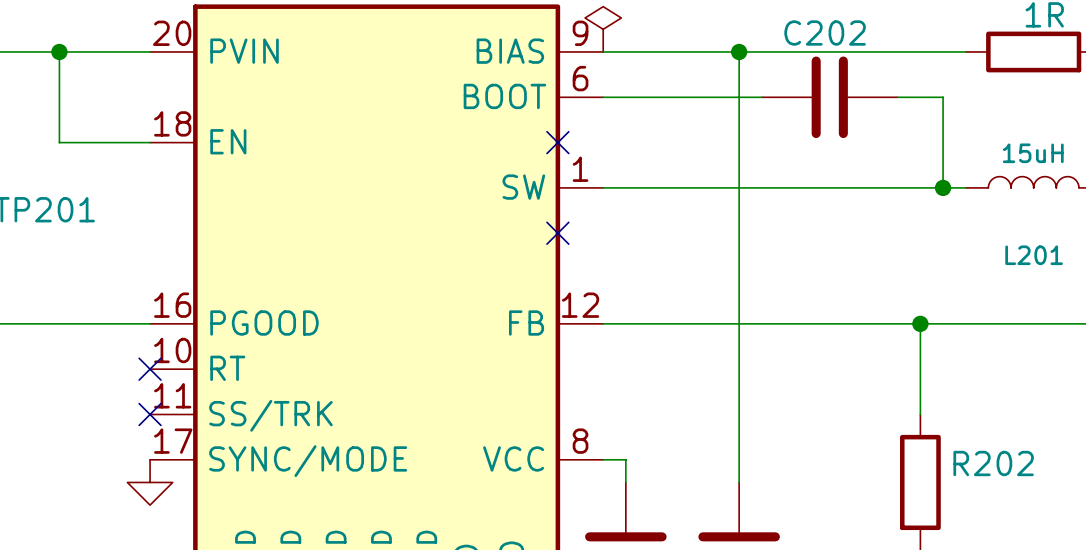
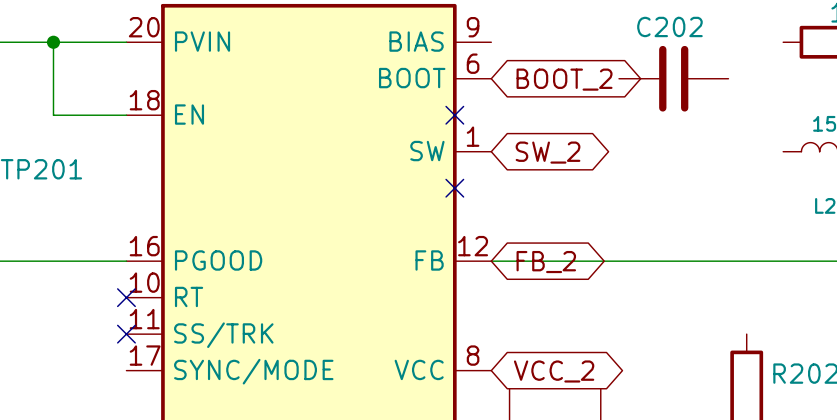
power symbol: (603, 29) -> none
wire: (603, 51) (965, 51) -> none
wire: (739, 51) (739, 482) -> none
junction: (739, 51) -> none
wire: (603, 97) (761, 97) -> none
wire: (897, 97) (943, 97) (943, 187) -> none
global label: none -> BOOT_2 (564, 79)
wire: (603, 187) (965, 187) -> none
junction: (943, 187) -> none
global label: none -> SW_2 (548, 152)
wire: (920, 323) (920, 414) -> none
junction: (920, 323) -> none
global label: none -> FB_2 (546, 262)
wire: (603, 459) (625, 459) (625, 482) -> none
global label: none -> VCC_2 (554, 371)
power symbol: (150, 482) -> none

